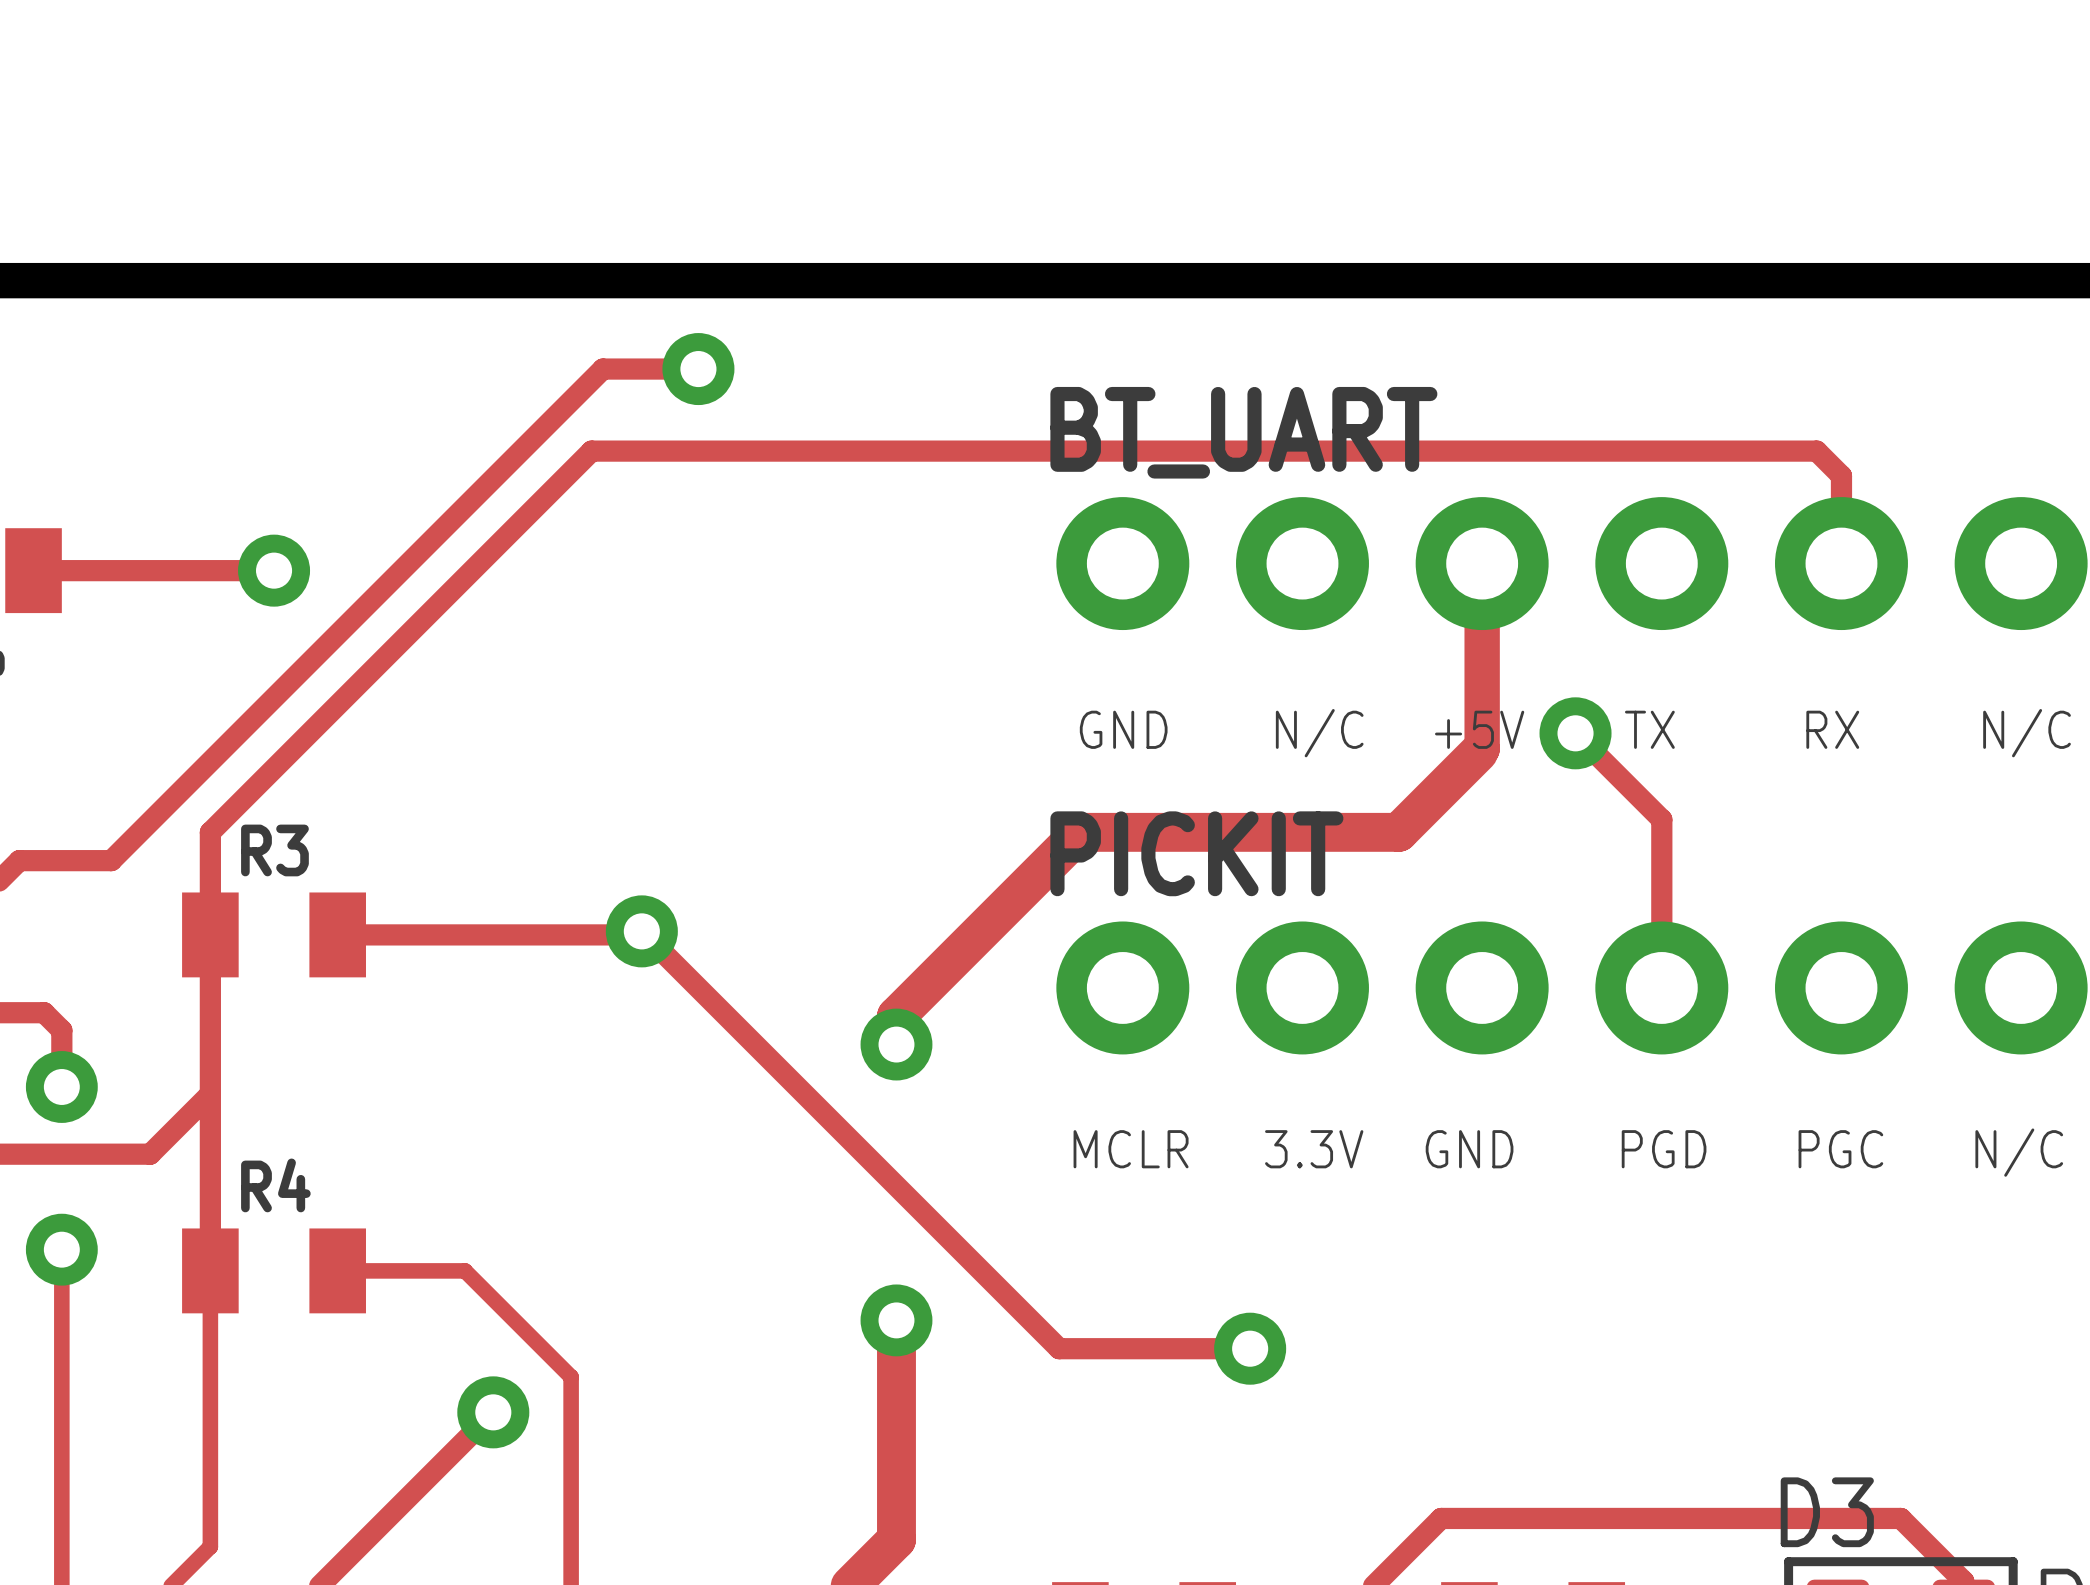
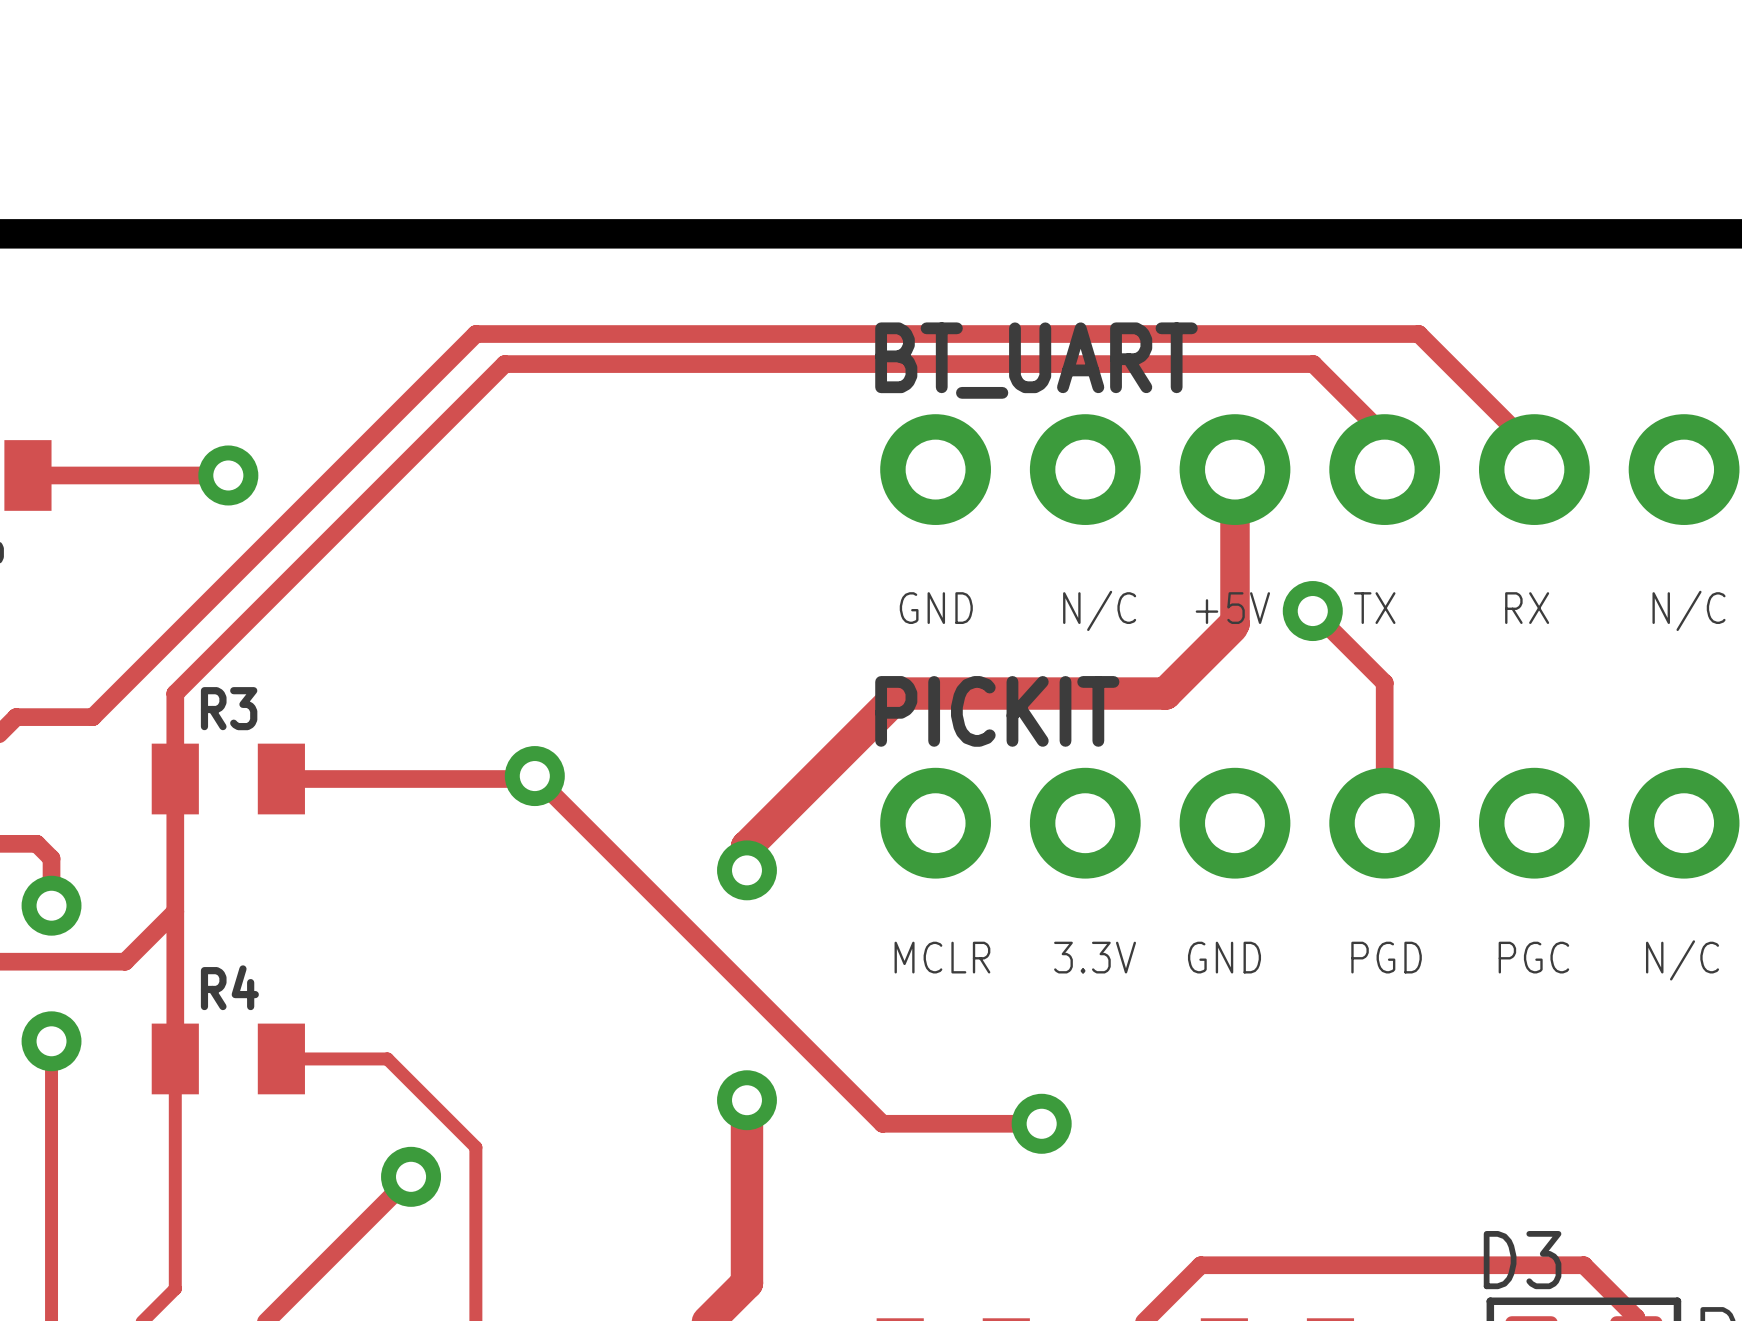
track: (698, 369) (602, 369) (571, 400) -> none
via: (698, 369) -> none
track: (591, 451) (1816, 451) (1841, 475) (1841, 539) -> (475, 334) (1418, 334) (1534, 449)
track: none -> (492, 375) (504, 364) (1313, 364) (1384, 435) (1384, 469)

